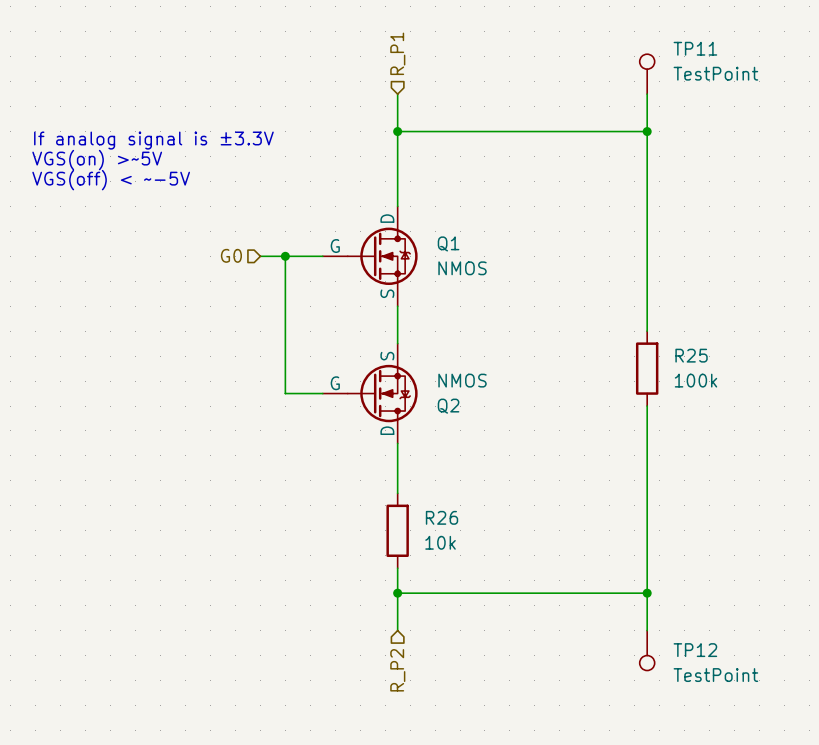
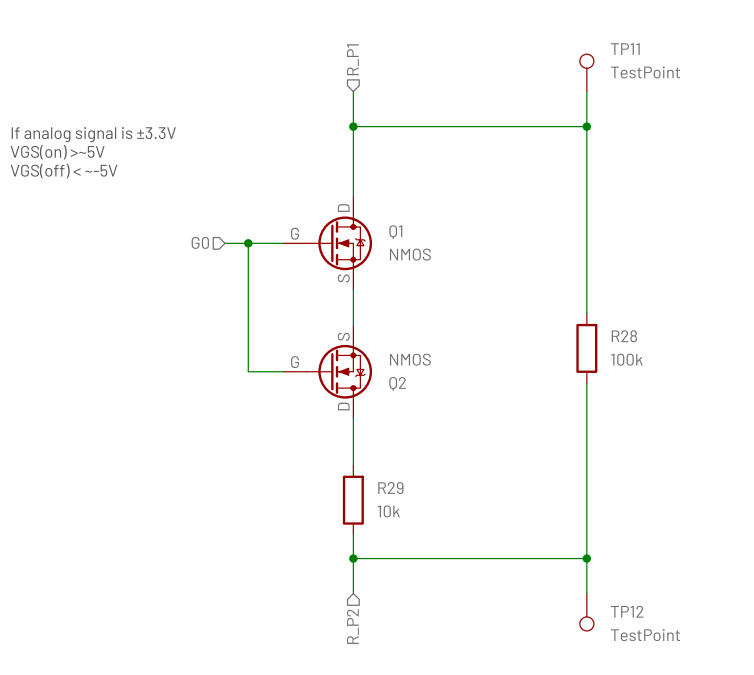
R25 name: R25 (691, 355) -> R28 (624, 336)
R26 name: R26 (442, 517) -> R29 (390, 488)

